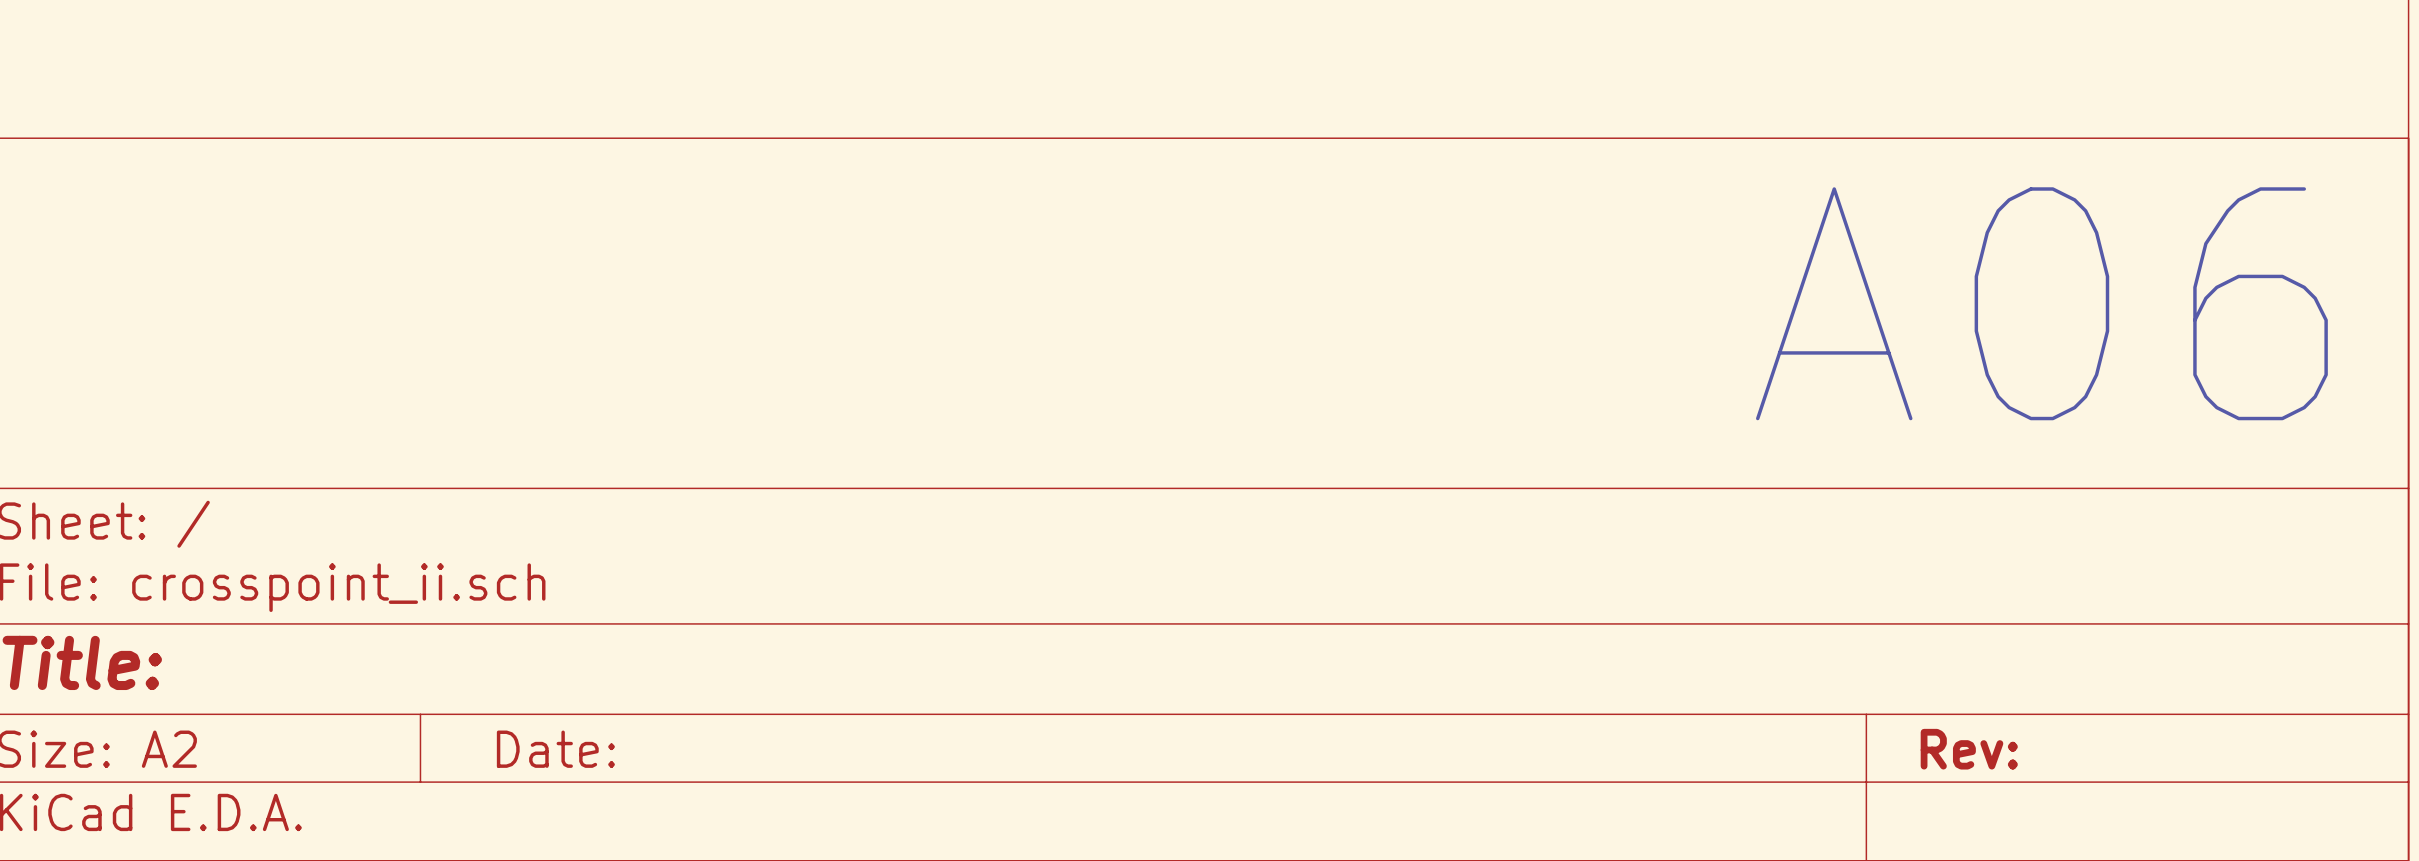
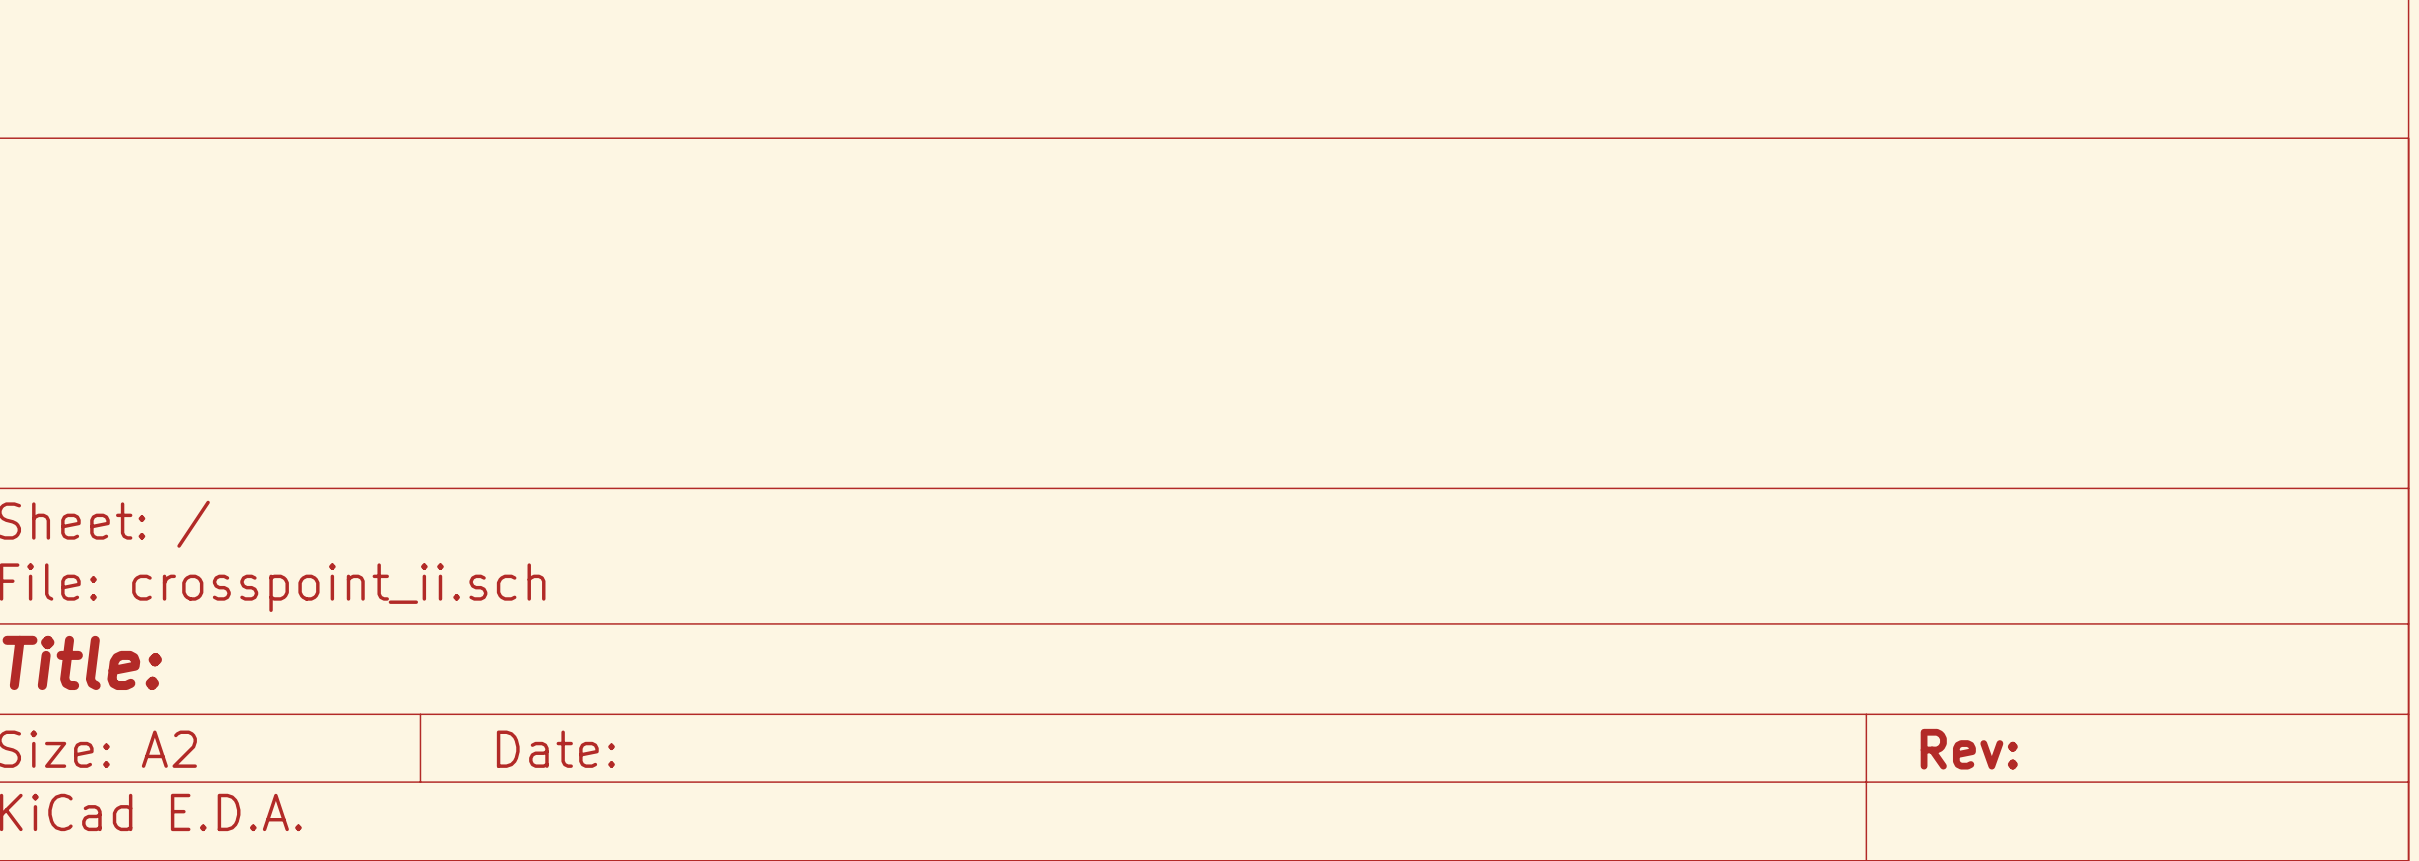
text: A06 (2041, 303) -> none

